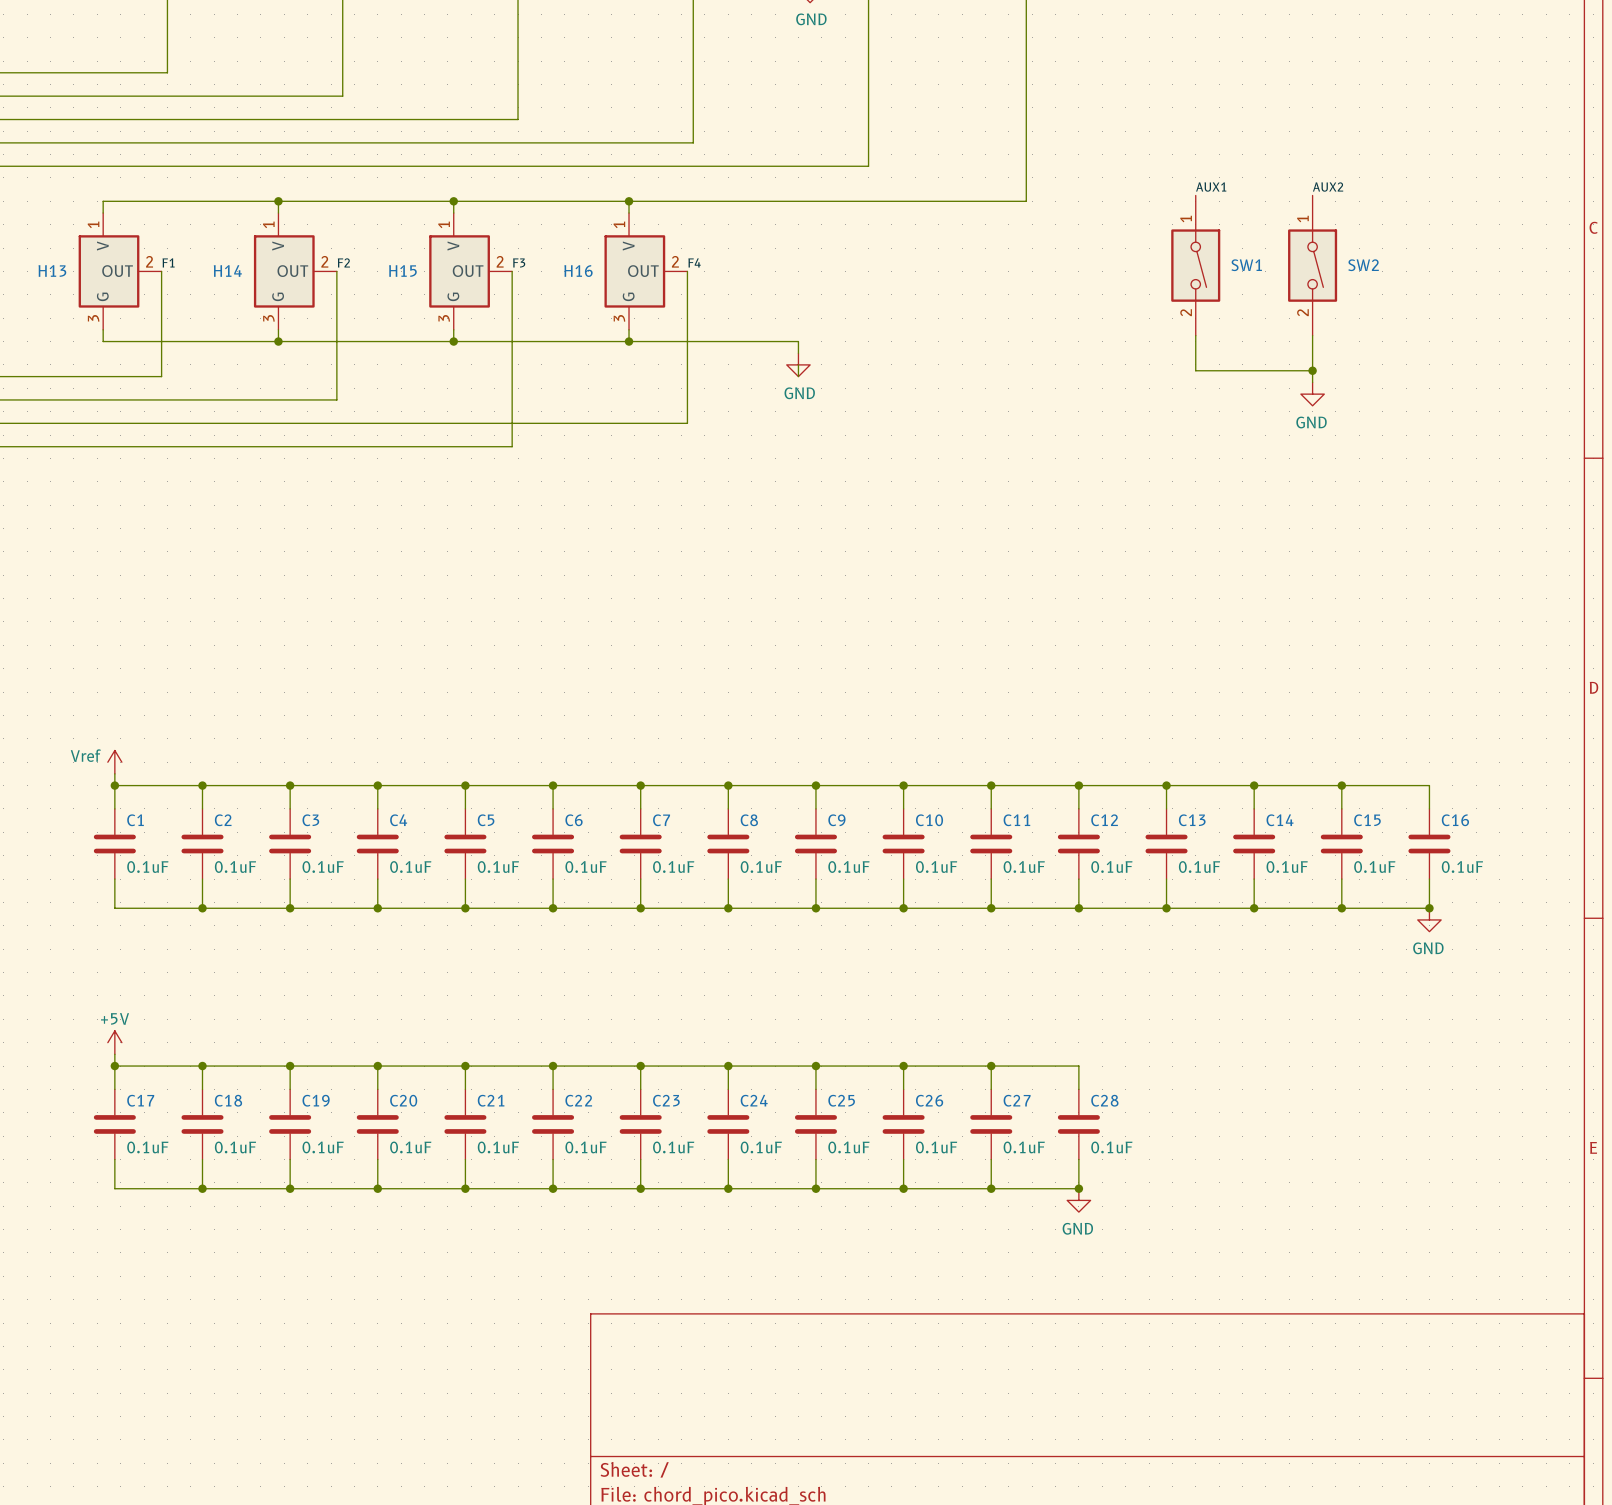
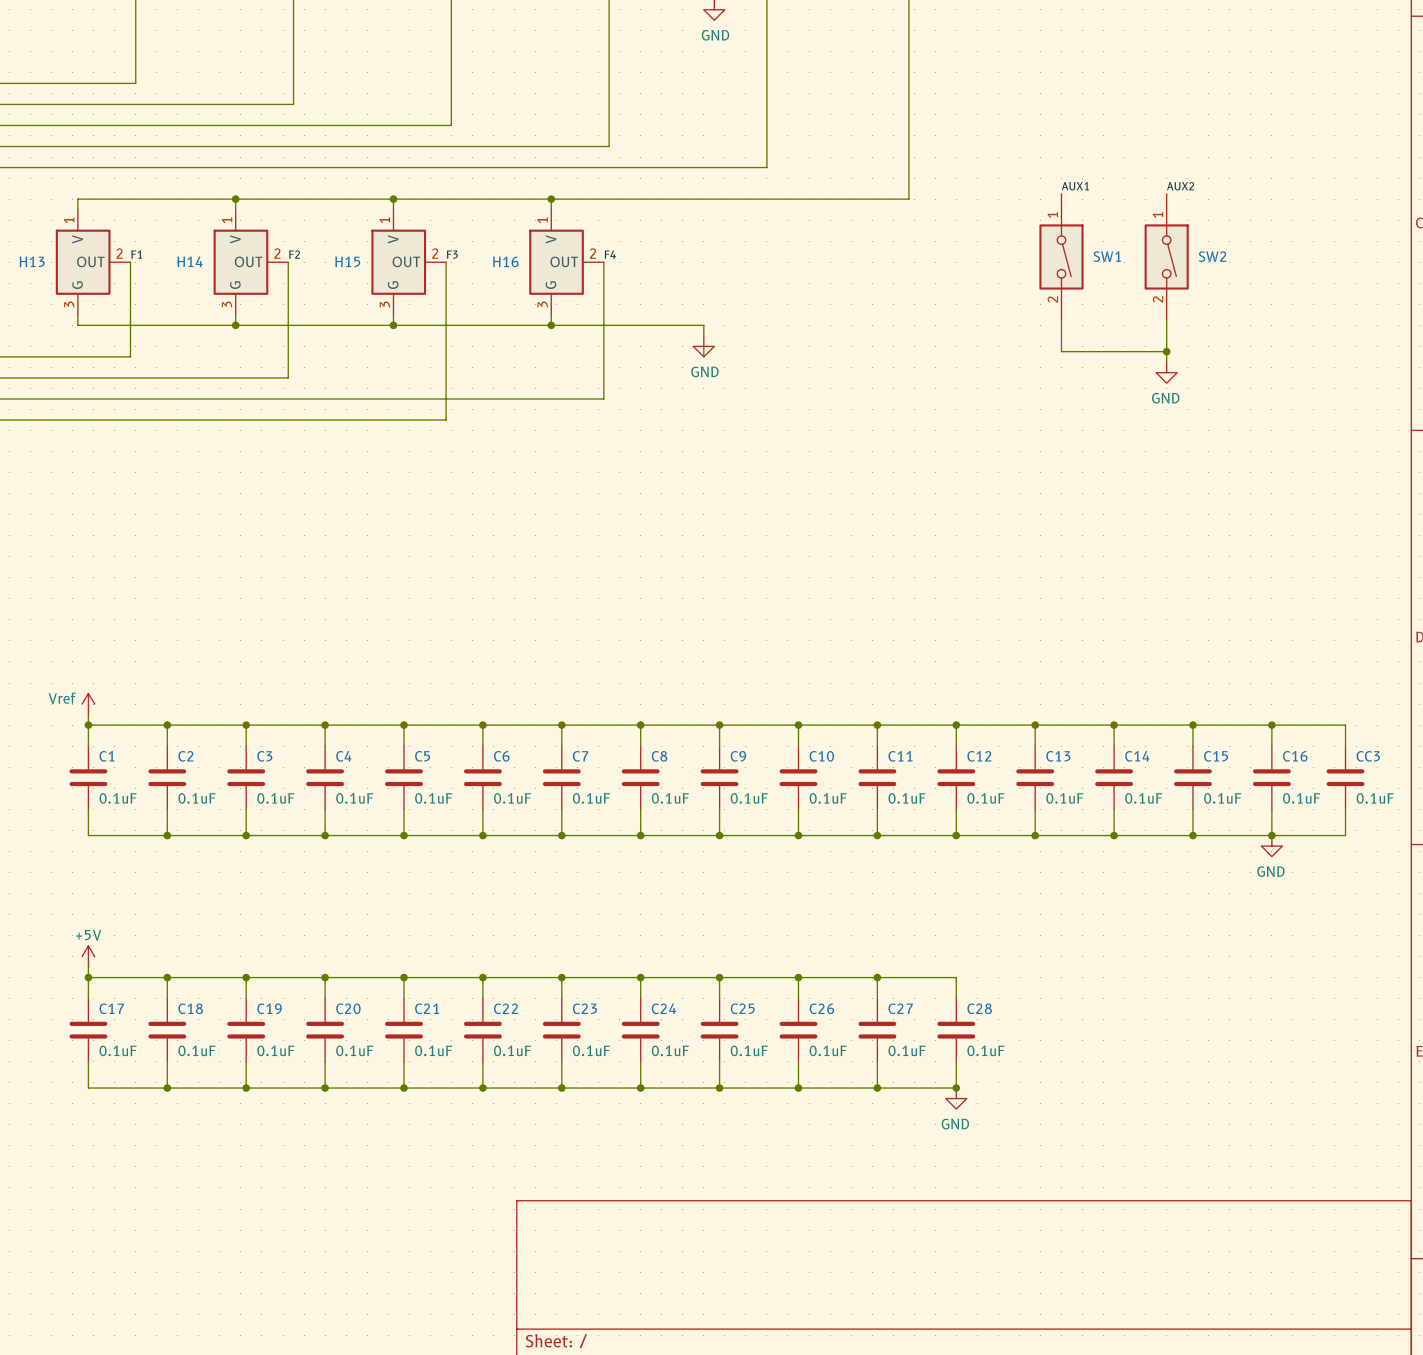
wire: none -> (1271, 725) (1345, 725) (1345, 746)
junction: none -> (1271, 725)
CC3: none -> 0.1uF (1345, 777)
wire: none -> (1345, 809) (1345, 835) (1271, 835)

